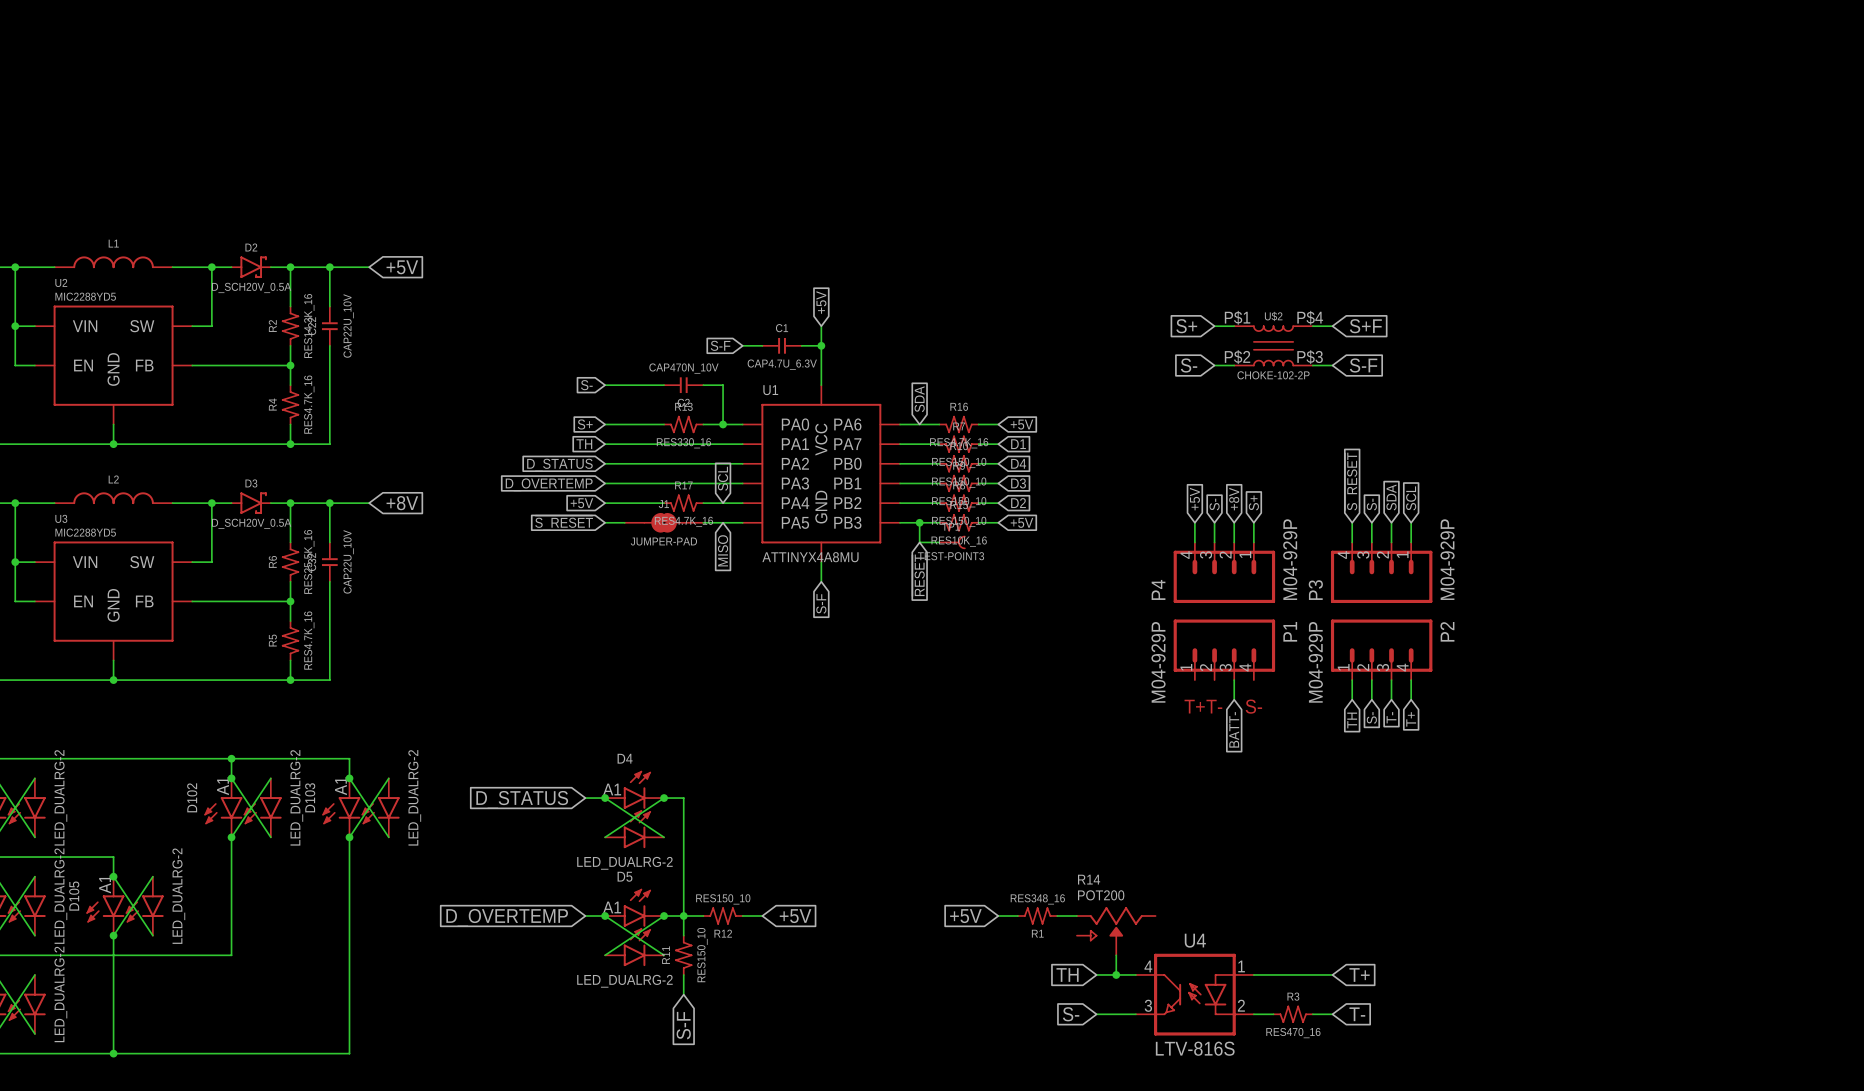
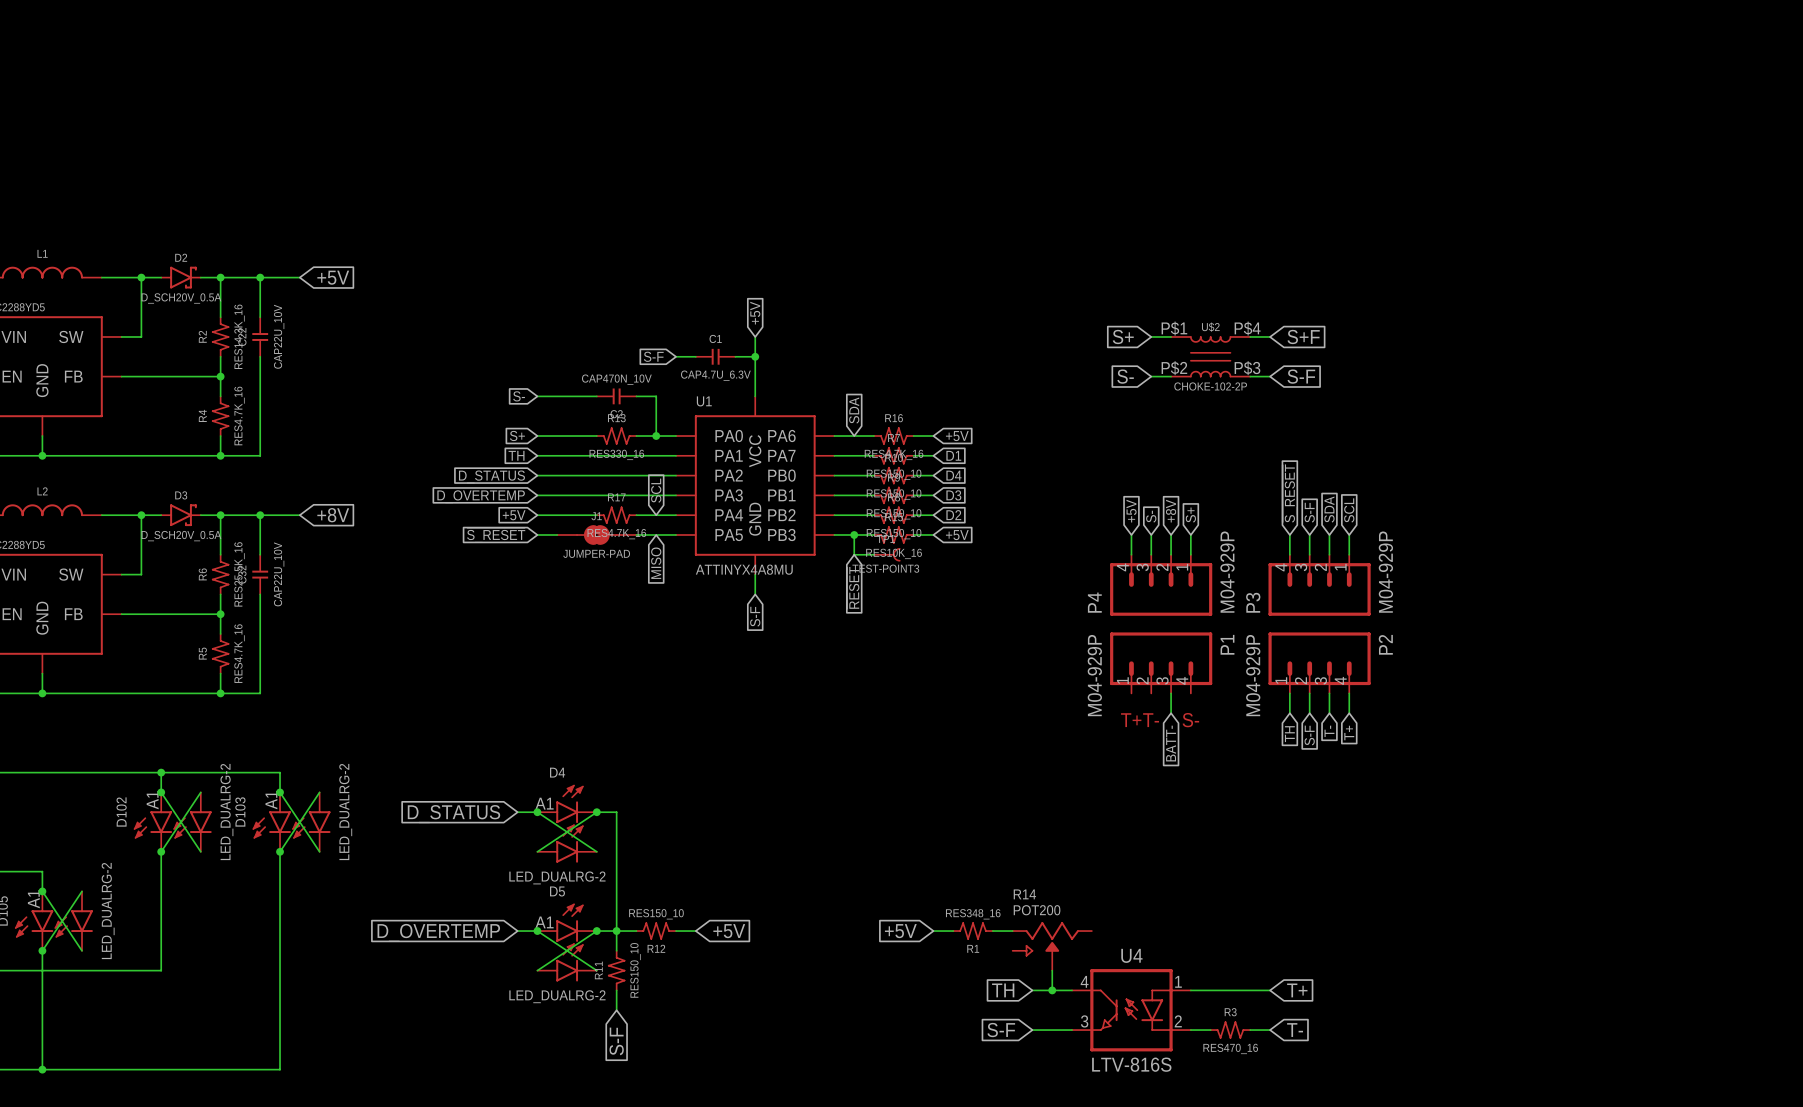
global label: S- (1371, 504) -> S-F (1309, 512)
global label: S- (1371, 717) -> S-F (1309, 735)
global label: S- (1071, 1014) -> S-F (1001, 1030)

